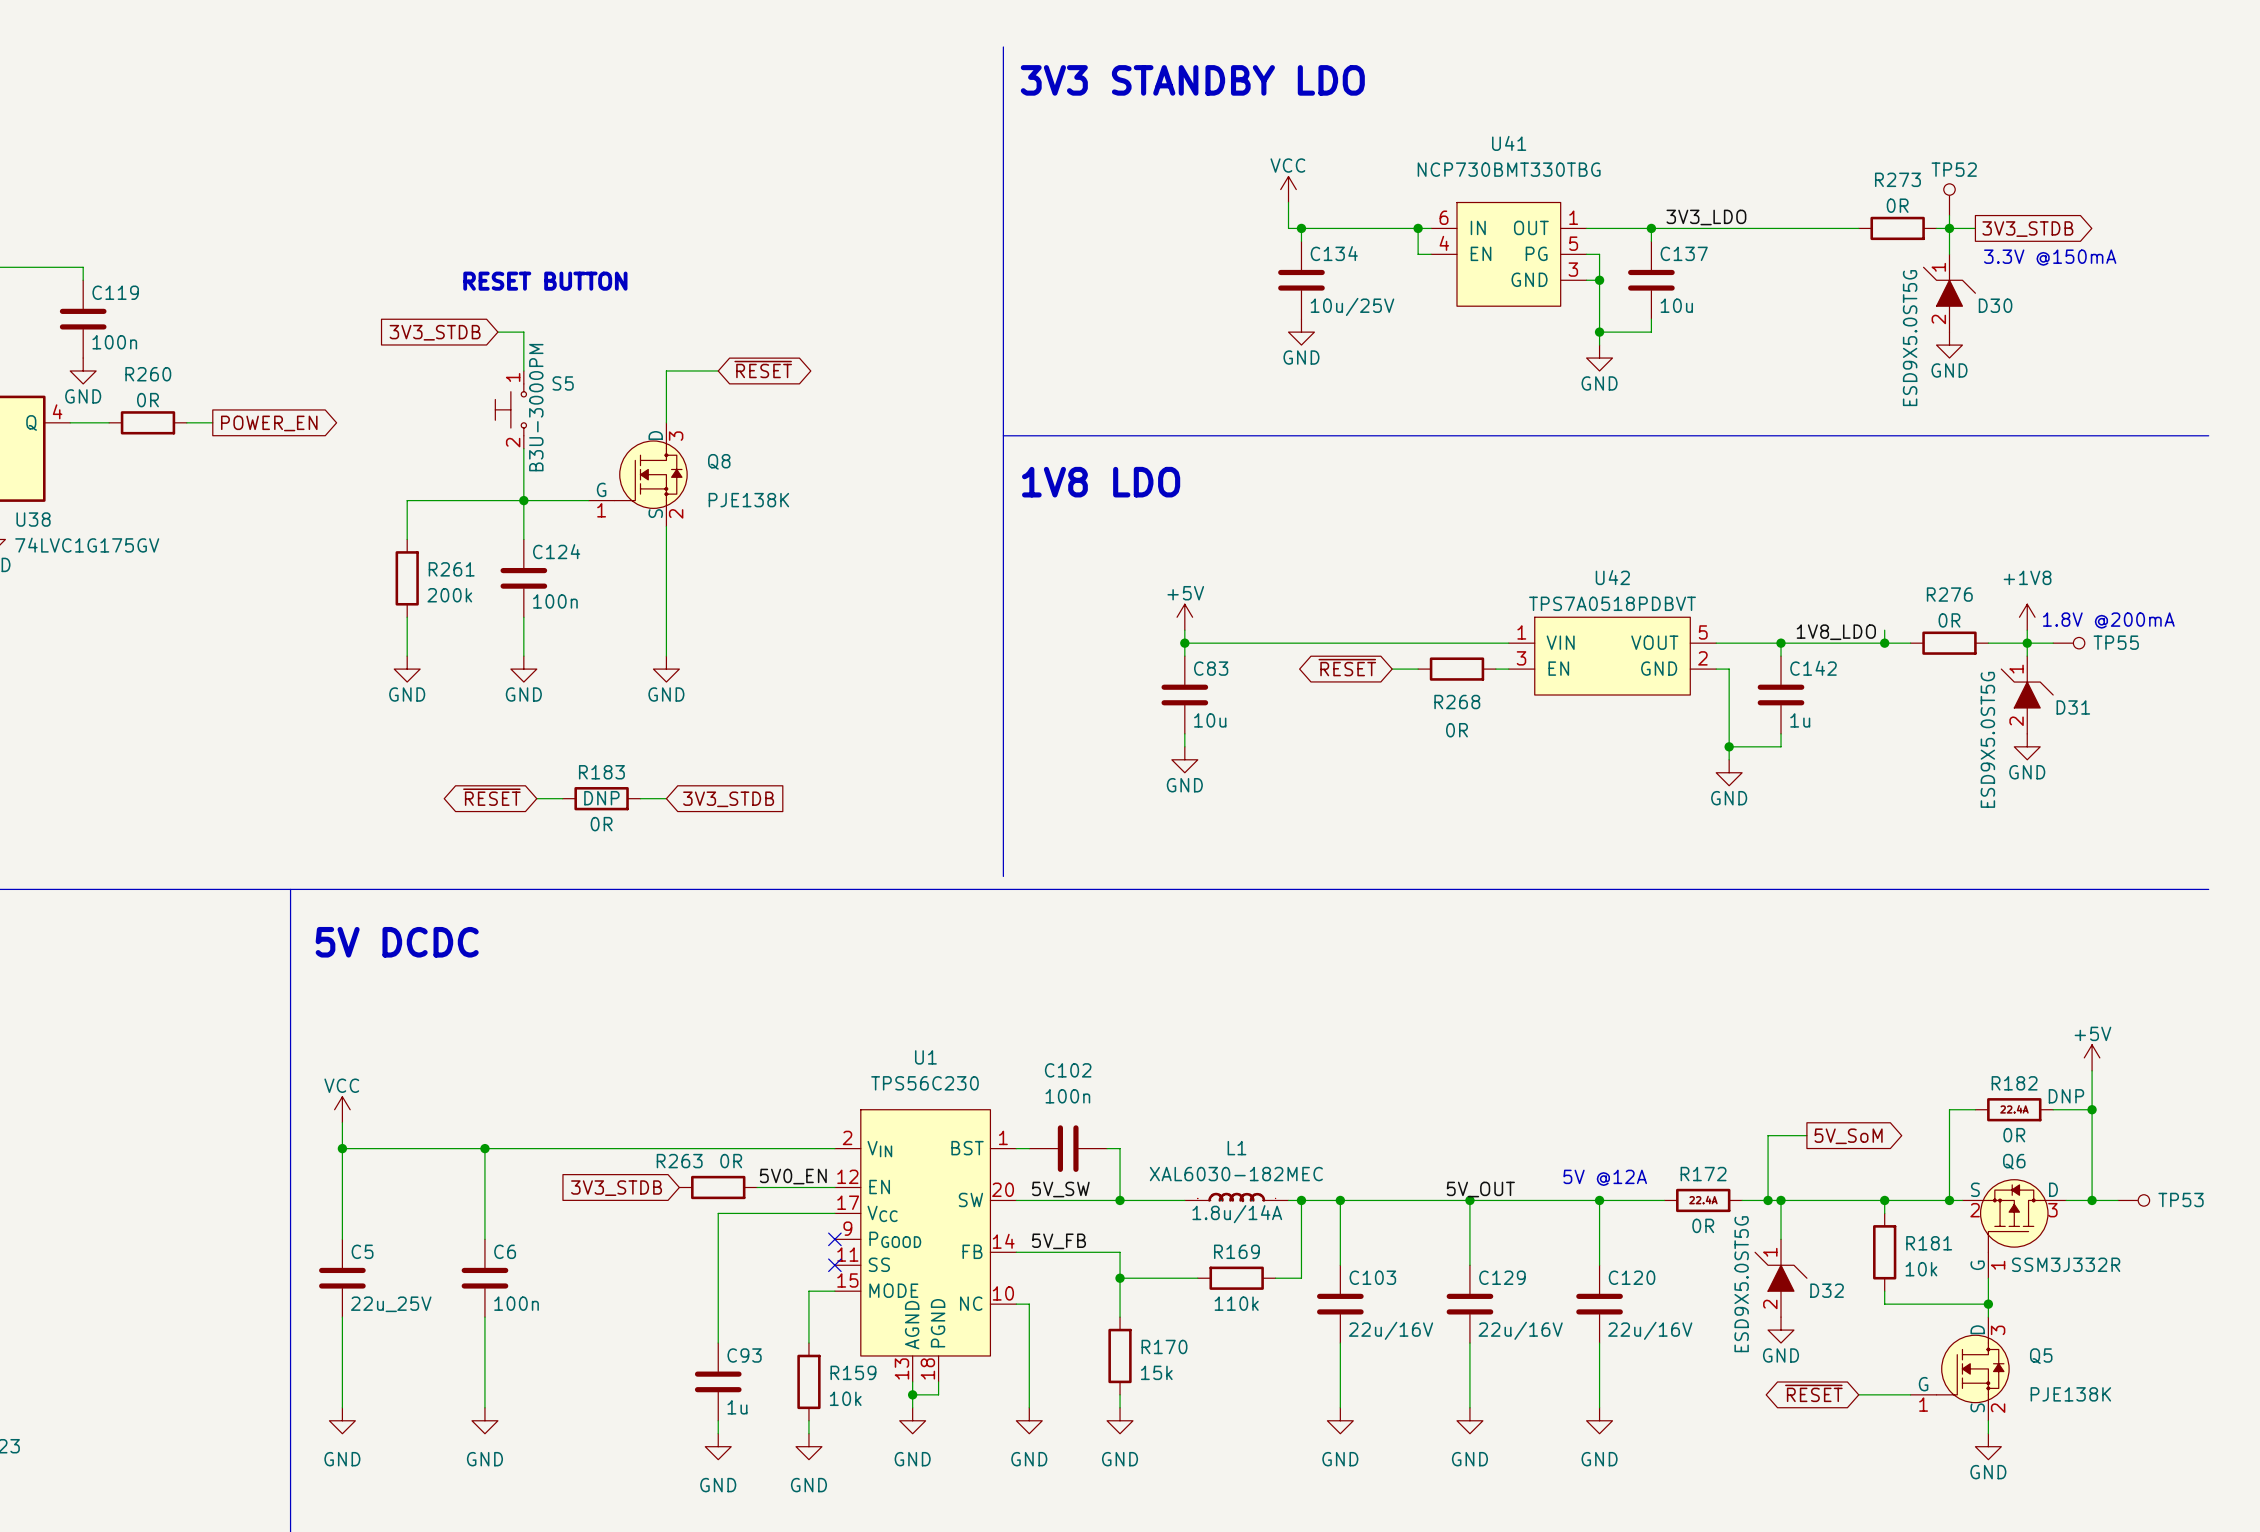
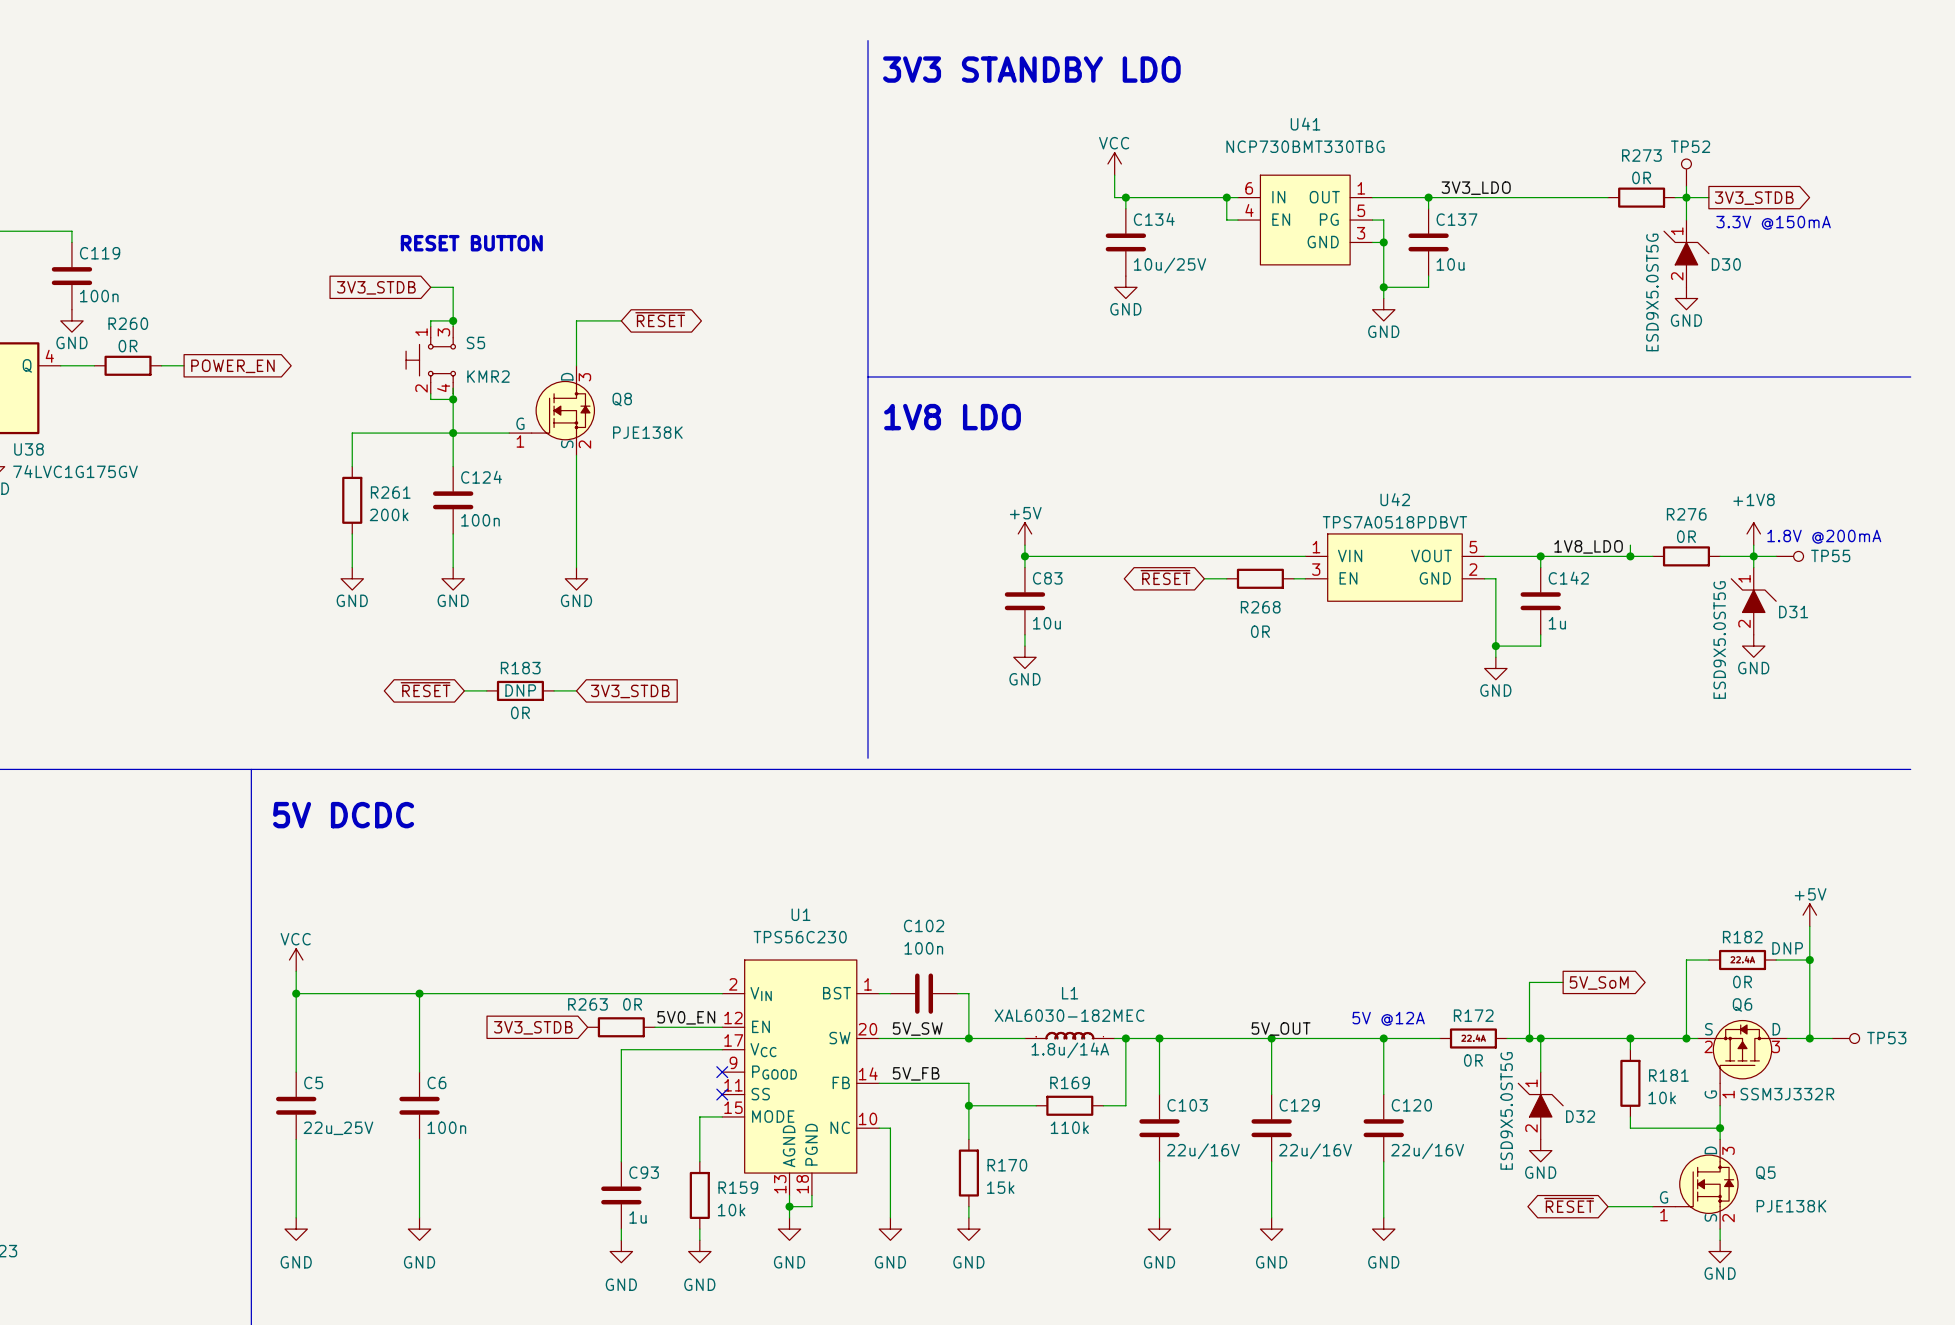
S5 symbol: [495, 370, 527, 449] -> [406, 326, 456, 394]
junction: none -> (453, 320)
wire: none -> (430, 326) (430, 320) (453, 320) (453, 326)
S5 value: B3U-3000PM (536, 407) -> KMR2 (488, 376)
wire: none -> (430, 393) (430, 399) (453, 399)
junction: none -> (453, 399)

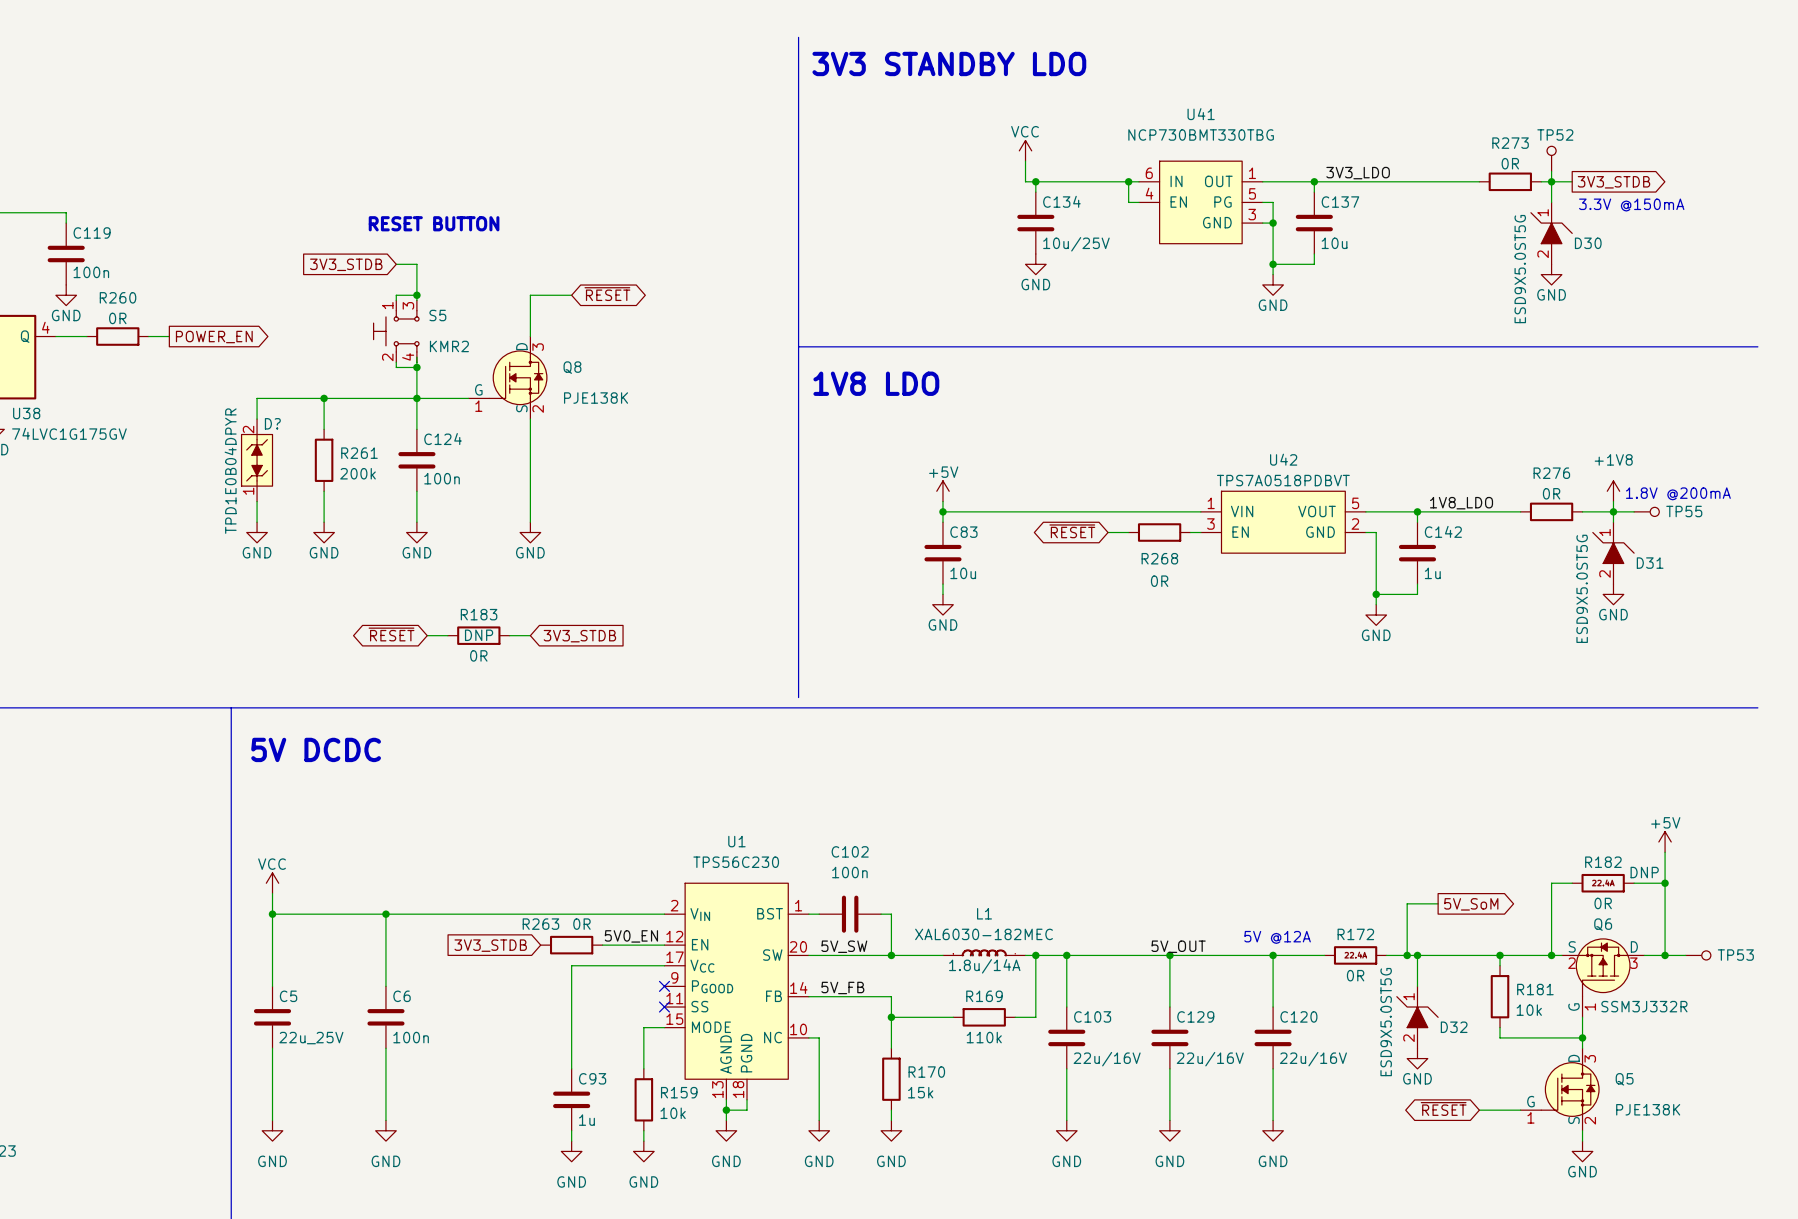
wire: none -> (324, 398) (257, 398) (257, 419)
junction: none -> (324, 398)
D?: none -> TPD1E0B04DPYR (257, 460)
wire: none -> (257, 501) (257, 522)
wire: (1630, 545) (1630, 556) -> none
junction: (1630, 556) -> none
power symbol: none -> GND (257, 532)

